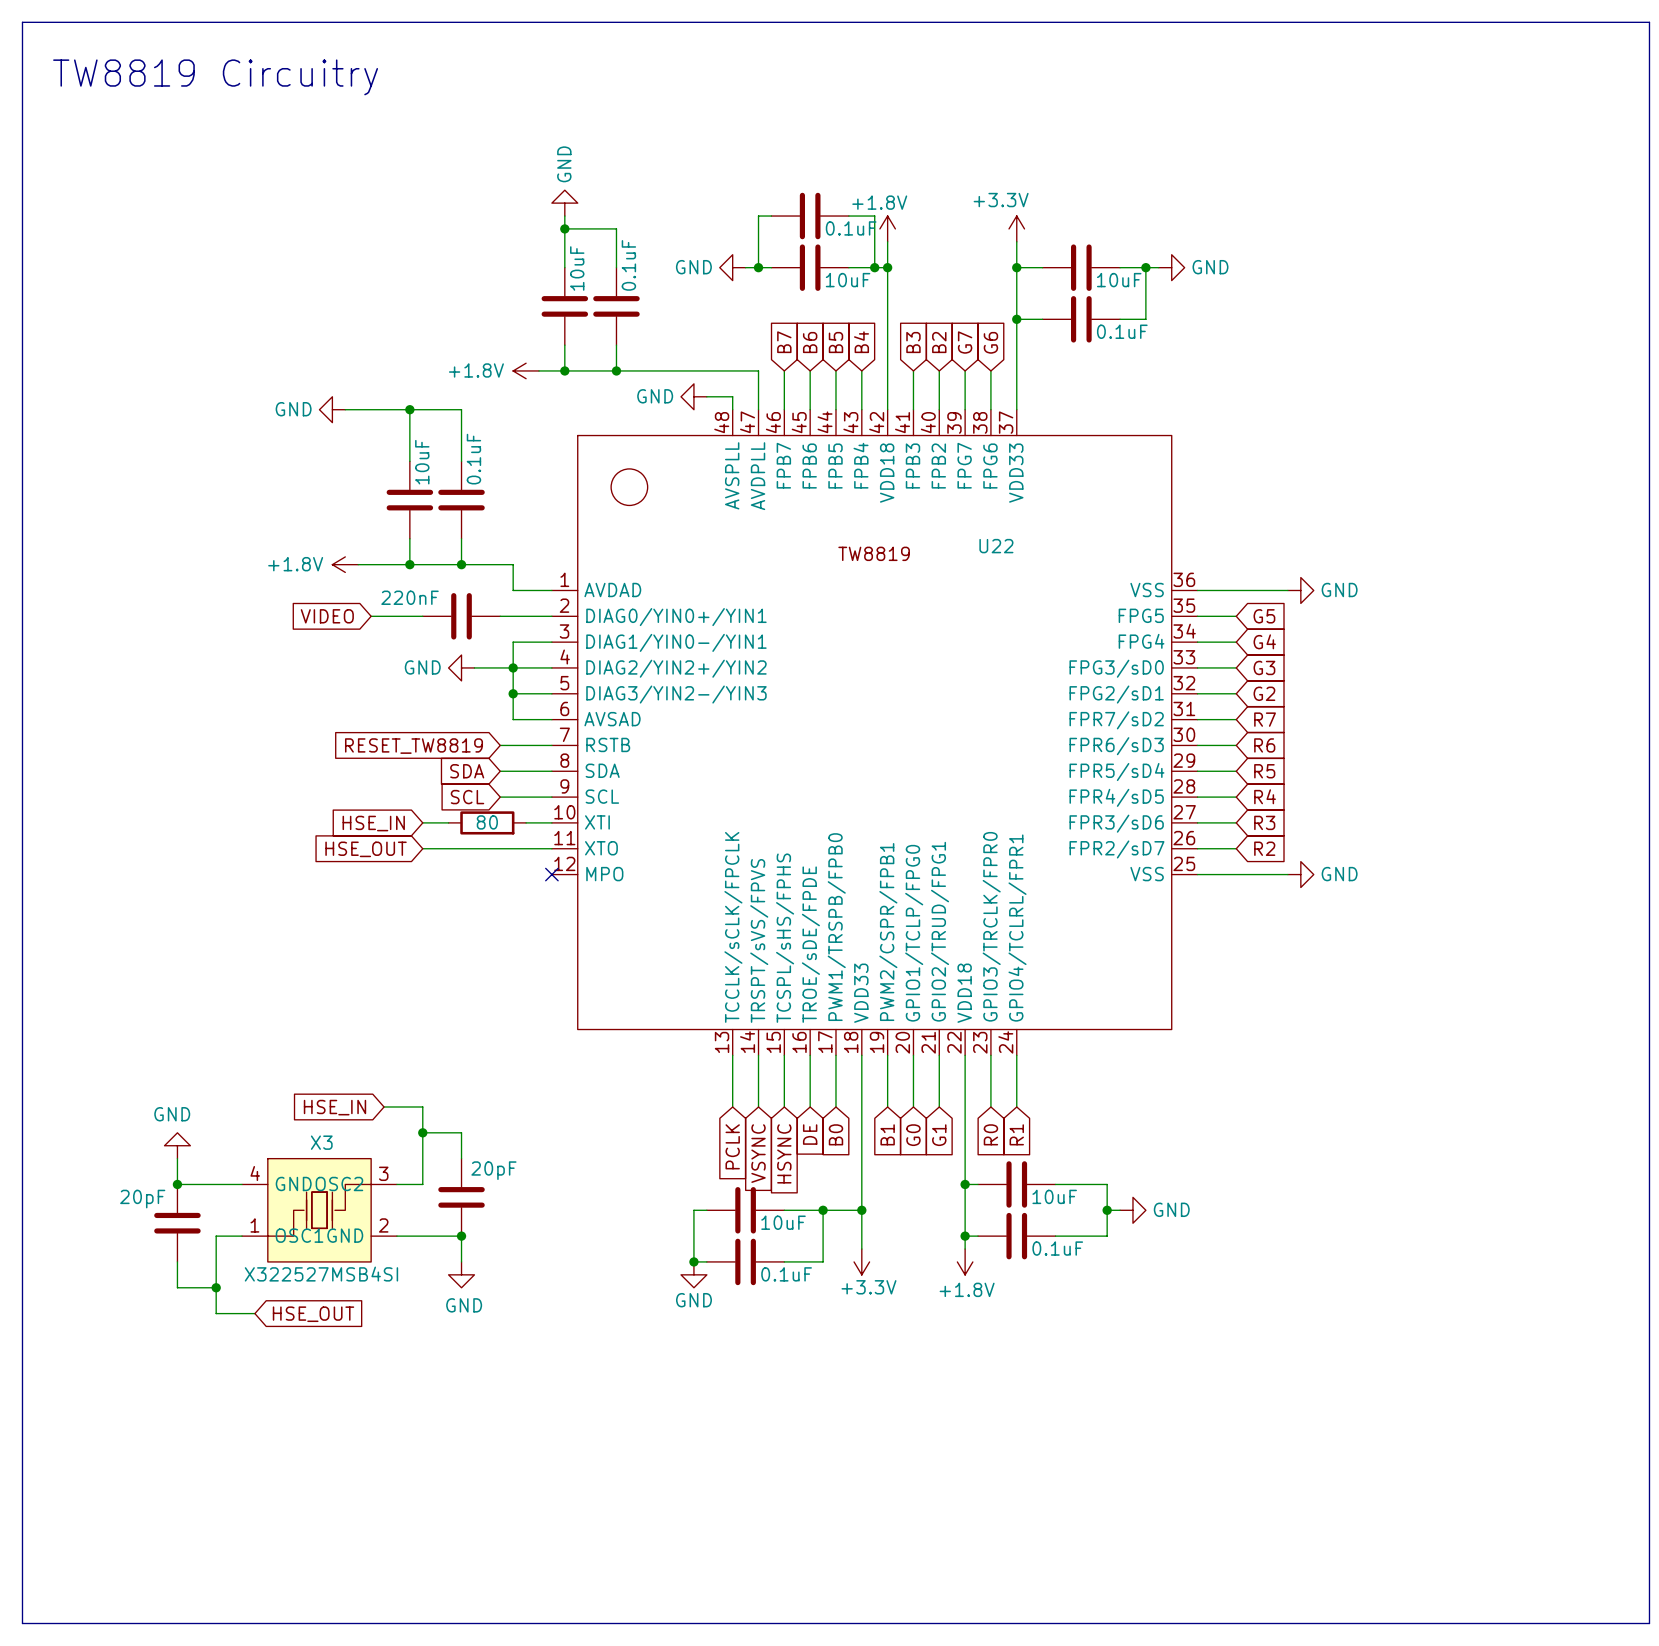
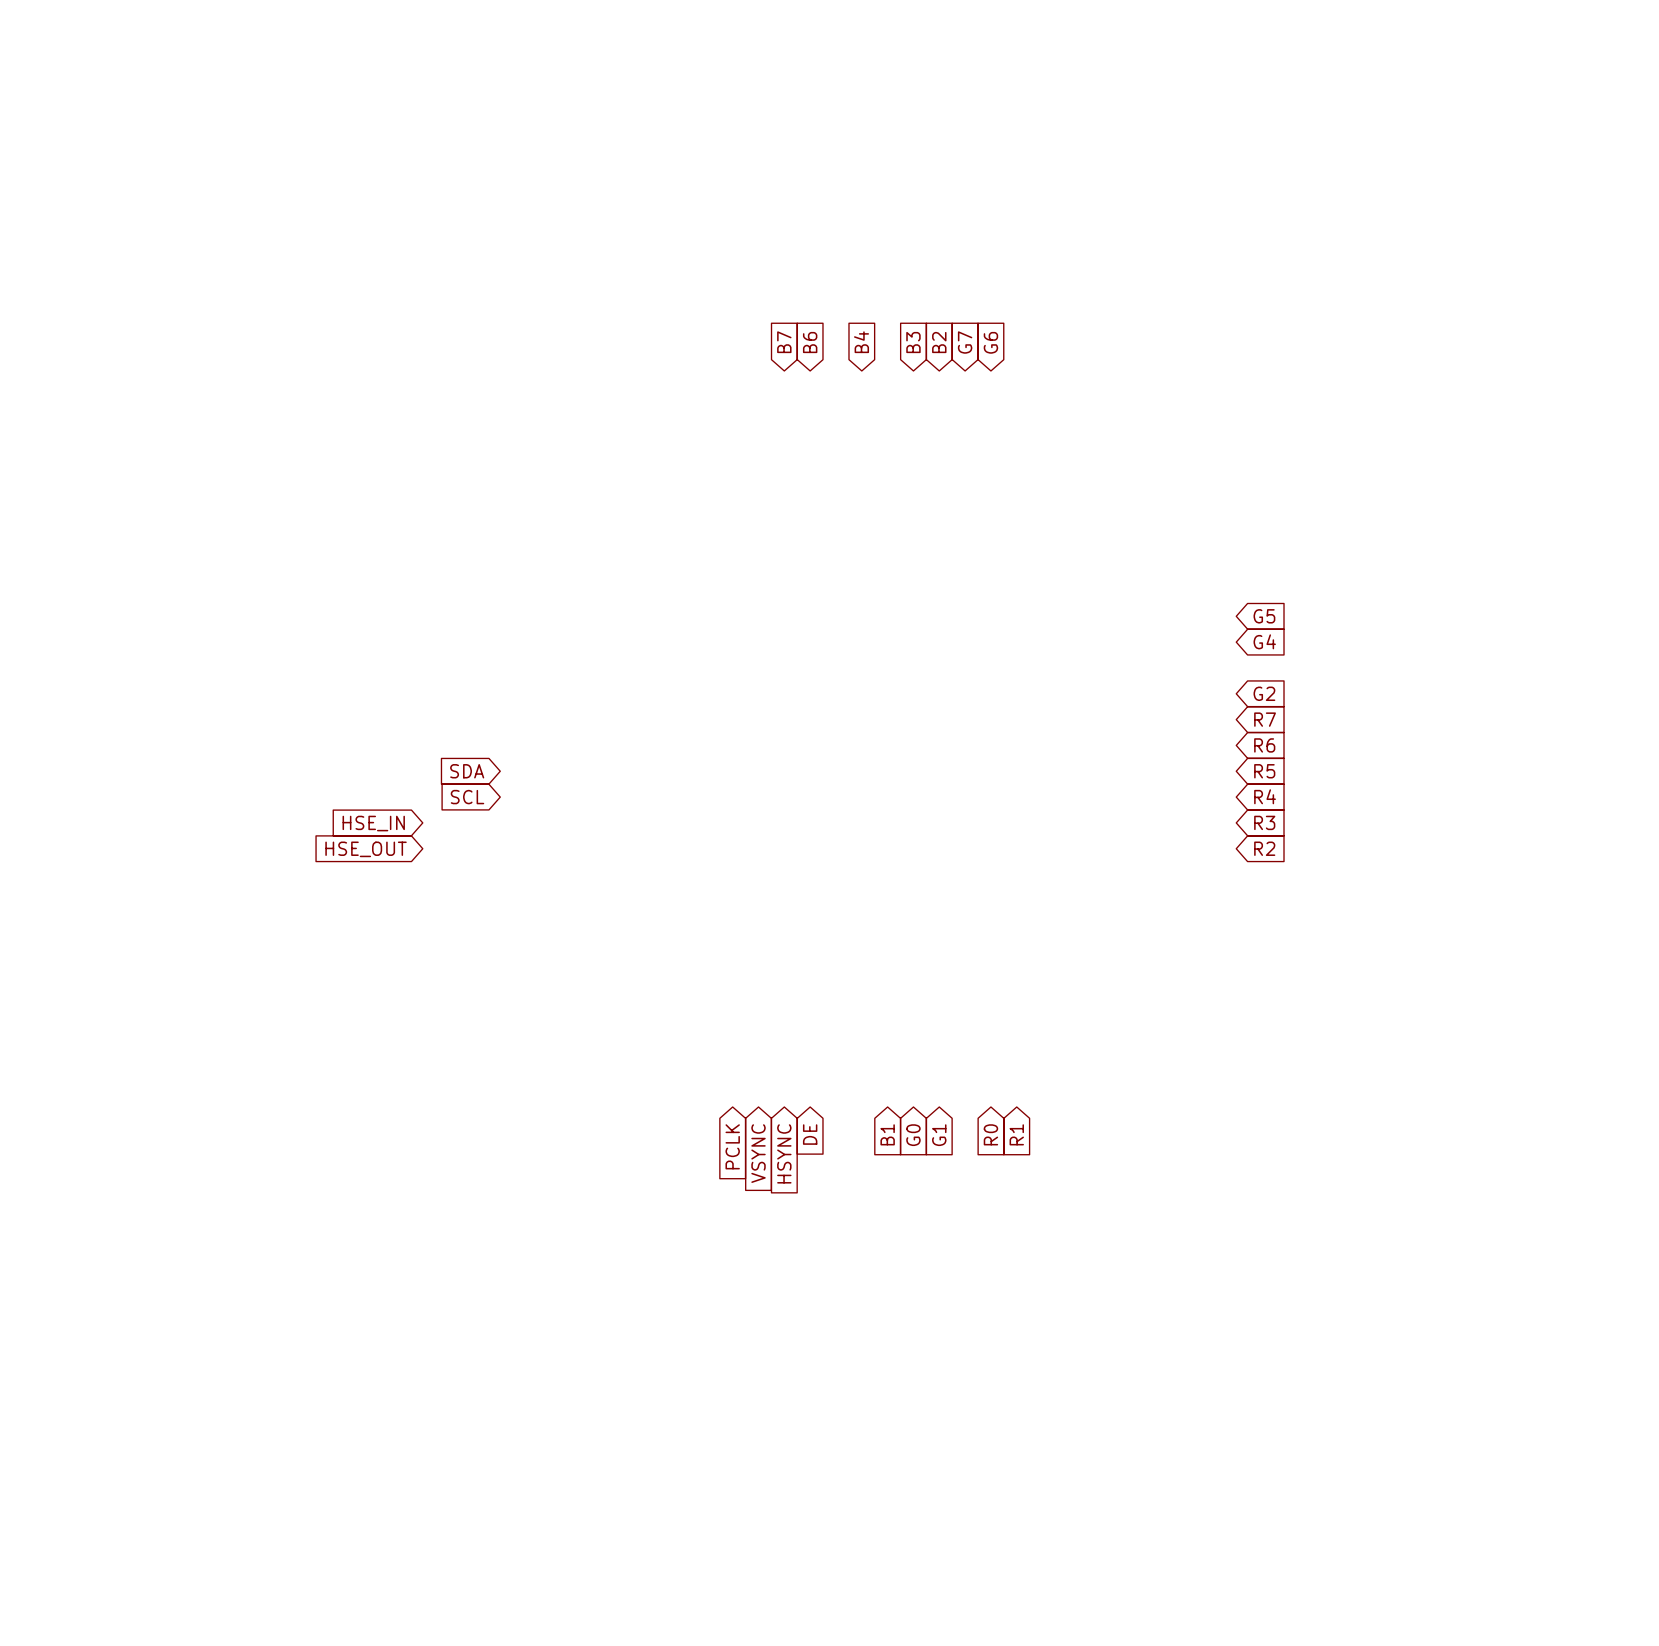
line: (22, 22) (1649, 22) (1649, 1623) (22, 1623) (22, 22) -> none
text: TW8819 Circuitry (215, 77) -> none
power symbol: GND (564, 203) -> none
wire: (564, 216) (564, 267) -> none
wire: (771, 216) (758, 216) (758, 267) -> none
part: 0.1uF (810, 216) -> none
wire: (848, 216) (874, 216) (874, 267) -> none
wire: (564, 228) (616, 228) (616, 267) -> none
junction: (564, 228) -> none
power symbol: +1.8V (887, 228) -> none
power symbol: +3.3V (1016, 228) -> none
wire: (887, 241) (887, 409) -> none
wire: (1016, 241) (1016, 409) -> none
power symbol: GND (732, 267) -> none
wire: (745, 267) (771, 267) -> none
junction: (758, 267) -> none
part: 10uF (810, 267) -> none
wire: (848, 267) (887, 267) -> none
junction: (874, 267) -> none
junction: (887, 267) -> none
wire: (1016, 267) (1042, 267) -> none
junction: (1016, 267) -> none
part: 10uF (1081, 267) -> none
wire: (1120, 267) (1158, 267) -> none
wire: (1145, 267) (1145, 319) (1120, 319) -> none
junction: (1145, 267) -> none
power symbol: GND (1171, 267) -> none
part: 10uF (564, 306) -> none
part: 0.1uF (616, 306) -> none
wire: (1016, 319) (1042, 319) -> none
junction: (1016, 319) -> none
part: 0.1uF (1081, 319) -> none
global label: B5 (835, 342) -> none
wire: (564, 345) (564, 370) -> none
wire: (616, 345) (616, 370) -> none
power symbol: +1.8V (526, 370) -> none
wire: (538, 370) (758, 370) (758, 409) -> none
junction: (564, 370) -> none
junction: (616, 370) -> none
wire: (784, 370) (784, 409) -> none
wire: (810, 370) (810, 409) -> none
wire: (835, 370) (835, 409) -> none
wire: (861, 370) (861, 409) -> none
wire: (913, 370) (913, 409) -> none
wire: (939, 370) (939, 409) -> none
wire: (965, 370) (965, 409) -> none
wire: (990, 370) (990, 409) -> none
power symbol: GND (693, 396) -> none
wire: (706, 396) (732, 396) (732, 409) -> none
power symbol: GND (332, 409) -> none
wire: (345, 409) (461, 409) (461, 461) -> none
wire: (409, 409) (409, 461) -> none
junction: (409, 409) -> none
part: 10uF (409, 500) -> none
part: 0.1uF (461, 500) -> none
wire: (409, 538) (409, 564) -> none
wire: (461, 538) (461, 564) -> none
power symbol: +1.8V (345, 564) -> none
wire: (358, 564) (513, 564) (513, 590) (551, 590) -> none
junction: (409, 564) -> none
junction: (461, 564) -> none
wire: (1197, 590) (1287, 590) -> none
power symbol: GND (1300, 590) -> none
global label: VIDEO (327, 616) -> none
wire: (371, 616) (422, 616) -> none
part: 220nF (461, 616) -> none
wire: (500, 616) (551, 616) -> none
wire: (1197, 616) (1236, 616) -> none
wire: (551, 642) (513, 642) (513, 719) (551, 719) -> none
wire: (1197, 642) (1236, 642) -> none
power symbol: GND (461, 667) -> none
wire: (474, 667) (551, 667) -> none
junction: (513, 667) -> none
wire: (1197, 667) (1236, 667) -> none
global label: G3 (1264, 667) -> none
wire: (513, 693) (551, 693) -> none
junction: (513, 693) -> none
wire: (1197, 693) (1236, 693) -> none
wire: (1197, 719) (1236, 719) -> none
U22: (874, 732) -> none
wire: (500, 745) (551, 745) -> none
wire: (1197, 745) (1236, 745) -> none
global label: RESET_TW8819 (414, 746) -> none
wire: (500, 771) (551, 771) -> none
wire: (1197, 771) (1236, 771) -> none
wire: (500, 797) (551, 797) -> none
wire: (1197, 797) (1236, 797) -> none
wire: (422, 822) (448, 822) -> none
part: 80 (487, 822) -> none
wire: (526, 822) (551, 822) -> none
wire: (1197, 822) (1236, 822) -> none
wire: (422, 848) (551, 848) -> none
wire: (1197, 848) (1236, 848) -> none
no-connect mark: (551, 874) -> none
wire: (1197, 874) (1287, 874) -> none
power symbol: GND (1300, 874) -> none
wire: (732, 1055) (732, 1106) -> none
wire: (758, 1055) (758, 1106) -> none
wire: (784, 1055) (784, 1106) -> none
wire: (810, 1055) (810, 1106) -> none
wire: (835, 1055) (835, 1106) -> none
wire: (861, 1055) (861, 1249) -> none
wire: (887, 1055) (887, 1106) -> none
wire: (913, 1055) (913, 1106) -> none
wire: (939, 1055) (939, 1106) -> none
wire: (965, 1055) (965, 1249) -> none
wire: (990, 1055) (990, 1106) -> none
wire: (1016, 1055) (1016, 1106) -> none
wire: (384, 1106) (422, 1106) (422, 1184) (396, 1184) -> none
global label: HSE_IN (334, 1107) -> none
wire: (422, 1132) (461, 1132) (461, 1158) -> none
junction: (422, 1132) -> none
global label: B0 (835, 1134) -> none
power symbol: GND (177, 1145) -> none
wire: (177, 1158) (177, 1184) (242, 1184) -> none
junction: (177, 1184) -> none
wire: (965, 1184) (978, 1184) -> none
junction: (965, 1184) -> none
part: 10uF (1016, 1184) -> none
wire: (1055, 1184) (1107, 1184) (1107, 1236) (1055, 1236) -> none
part: 20pF (461, 1197) -> none
X3: X322527MSB4SI (319, 1210) -> none
wire: (706, 1210) (693, 1210) (693, 1261) (706, 1261) -> none
part: 10uF (745, 1210) -> none
wire: (784, 1210) (861, 1210) -> none
wire: (823, 1210) (823, 1261) (784, 1261) -> none
junction: (823, 1210) -> none
junction: (861, 1210) -> none
wire: (1107, 1210) (1120, 1210) -> none
junction: (1107, 1210) -> none
power symbol: GND (1132, 1210) -> none
part: 20pF (177, 1223) -> none
wire: (242, 1236) (216, 1236) (216, 1313) (254, 1313) -> none
wire: (396, 1236) (461, 1236) (461, 1261) -> none
junction: (461, 1236) -> none
wire: (965, 1236) (978, 1236) -> none
junction: (965, 1236) -> none
part: 0.1uF (1016, 1236) -> none
wire: (177, 1261) (177, 1287) (216, 1287) -> none
junction: (693, 1261) -> none
part: 0.1uF (745, 1261) -> none
power symbol: +3.3V (861, 1261) -> none
power symbol: +1.8V (965, 1261) -> none
power symbol: GND (461, 1274) -> none
power symbol: GND (693, 1274) -> none
junction: (216, 1287) -> none
global label: HSE_OUT (313, 1314) -> none

